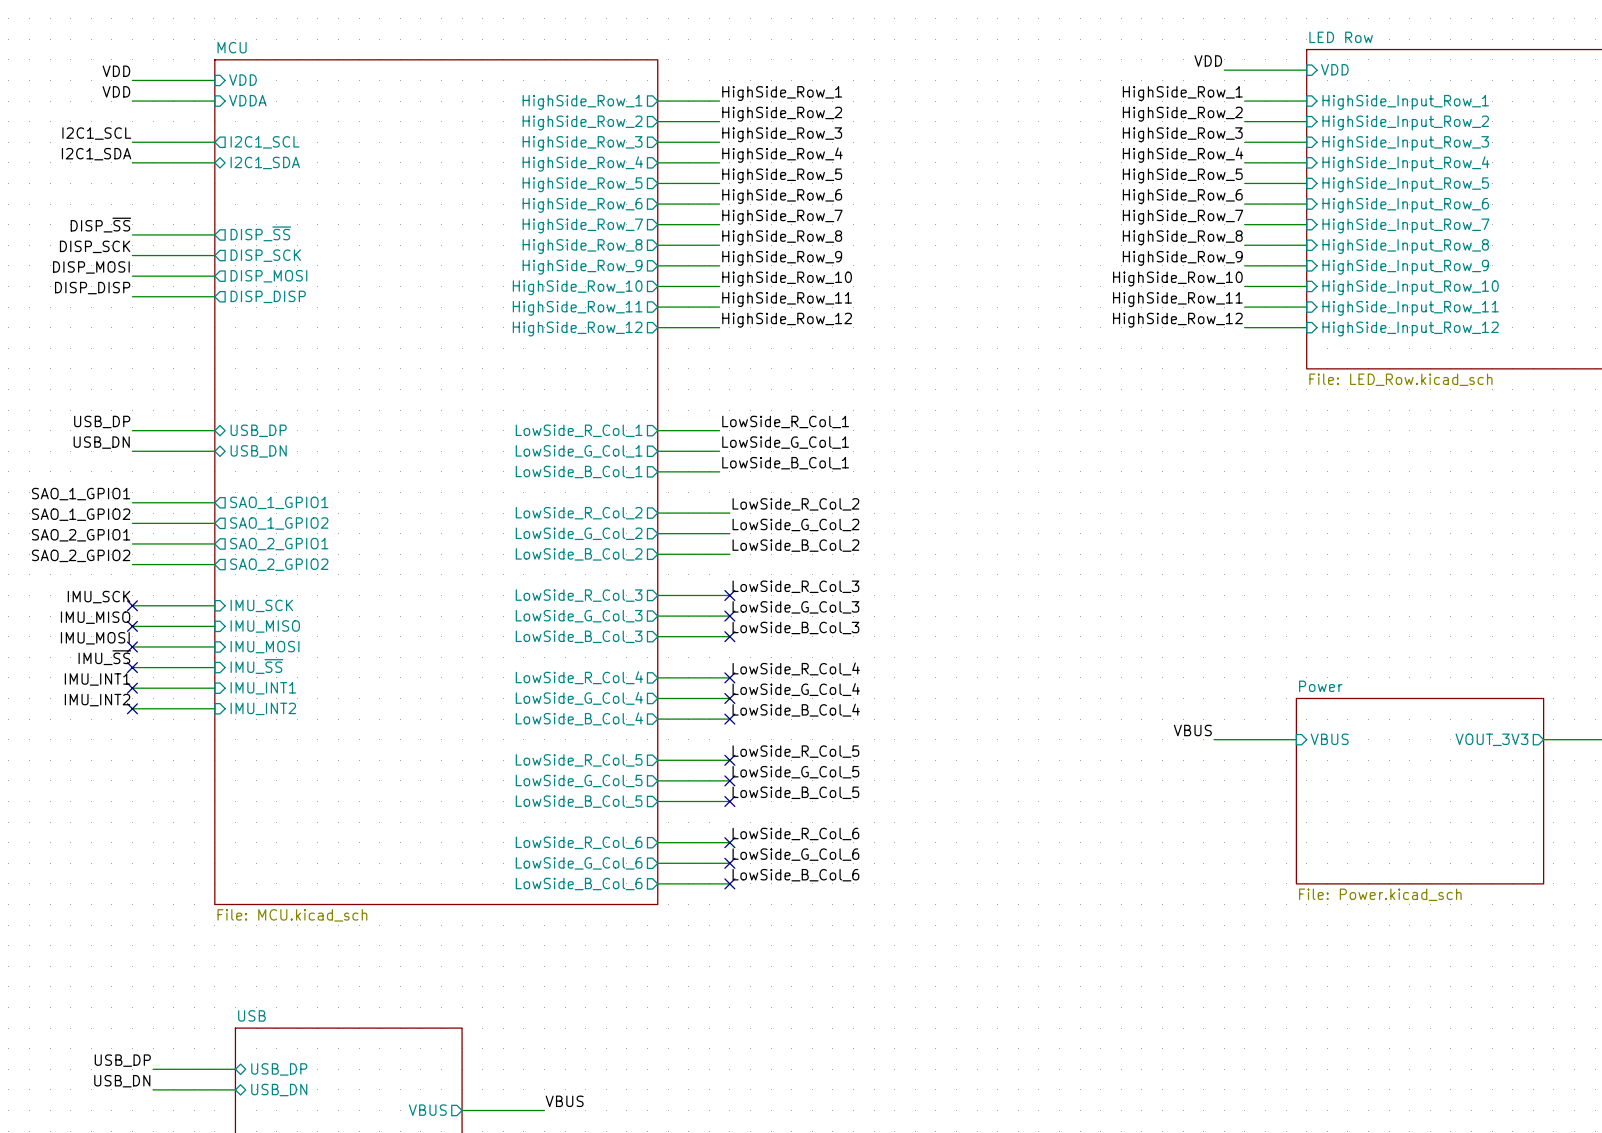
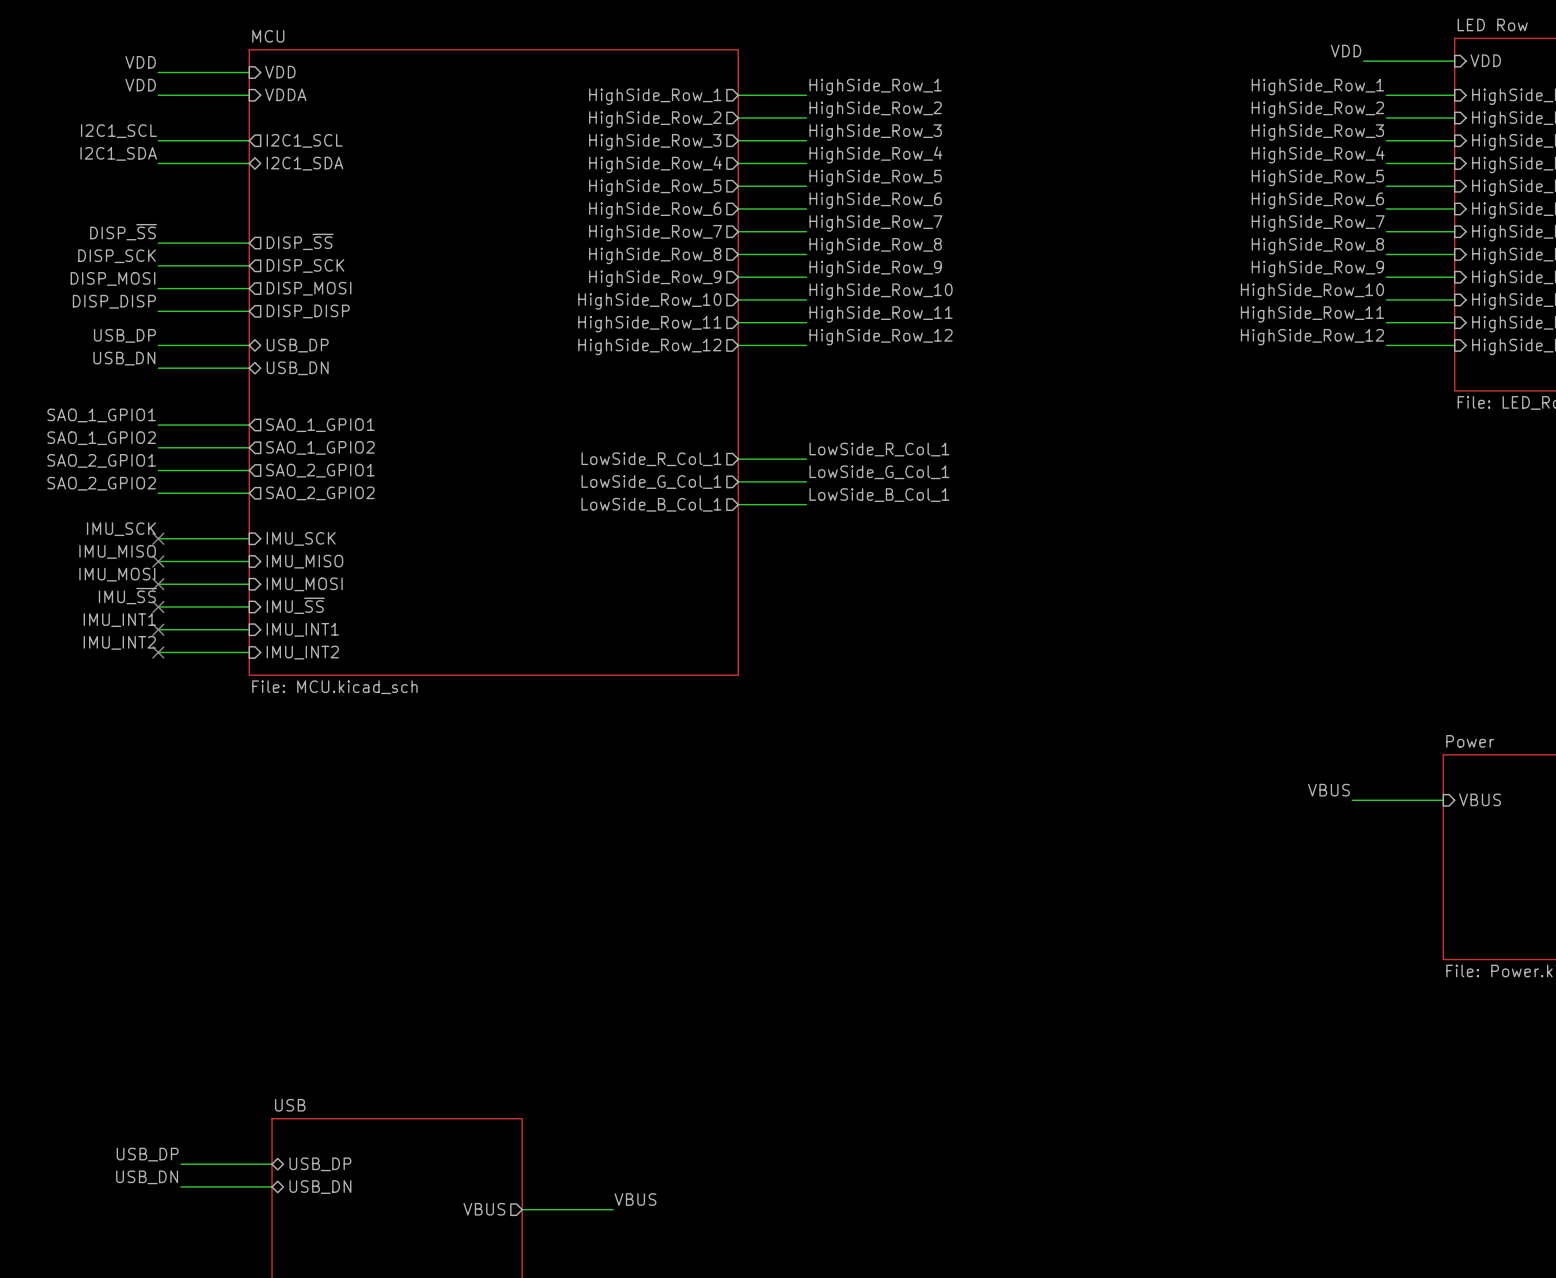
sheet MCU: none -> File: MCU.kicad_sch (493, 362)
label: none -> SAO_1_GPIO1 (101, 415)
wire: none -> (158, 425) (249, 425)
sheet pin: none -> SAO_1_GPIO1 (320, 425)
label: none -> SAO_1_GPIO2 (101, 438)
wire: none -> (158, 447) (249, 447)
sheet pin: none -> SAO_1_GPIO2 (320, 447)
label position: USB_DP (102, 421) -> USB_DP (124, 335)
wire: (132, 430) (214, 430) -> (158, 345) (249, 345)
sheet pin position: USB_DP (258, 430) -> USB_DP (297, 345)
label: none -> SAO_2_GPIO1 (101, 460)
sheet pin: none -> SAO_2_GPIO1 (320, 470)
label position: USB_DN (101, 442) -> USB_DN (124, 358)
wire: (132, 451) (214, 451) -> (158, 368) (249, 368)
sheet pin position: USB_DN (258, 451) -> USB_DN (297, 368)
label: none -> SAO_2_GPIO2 (101, 483)
sheet pin: none -> SAO_2_GPIO2 (320, 493)
sheet MCU: File: MCU.kicad_sch (436, 482) -> none
label: SAO_1_GPIO1 (81, 494) -> IMU_SCK (121, 529)
no-connect mark: none -> (158, 538)
sheet pin shape: output (279, 502) -> input (301, 538)
sheet pin: SAO_1_GPIO1 (279, 502) -> IMU_SCK (301, 538)
label: LowSide_R_Col_2 (795, 504) -> none
sheet pin: LowSide_R_Col_2 (579, 513) -> none
wire: (657, 513) (729, 513) -> none
label: SAO_1_GPIO2 (81, 514) -> IMU_MISO (117, 551)
no-connect mark: none -> (158, 561)
sheet pin shape: output (279, 523) -> input (304, 561)
sheet pin: SAO_1_GPIO2 (279, 523) -> IMU_MISO (304, 561)
label: LowSide_G_Col_2 (795, 524) -> none
sheet pin: LowSide_G_Col_2 (579, 533) -> none
wire: (657, 533) (729, 533) -> none
label: SAO_2_GPIO1 (81, 535) -> IMU_MOSI (117, 574)
no-connect mark: none -> (158, 584)
sheet pin shape: output (279, 544) -> input (304, 584)
sheet pin: SAO_2_GPIO1 (279, 544) -> IMU_MOSI (304, 584)
label: LowSide_B_Col_2 (795, 545) -> none
sheet pin: LowSide_B_Col_2 (579, 554) -> none
wire: (657, 554) (729, 554) -> none
label: SAO_2_GPIO2 (81, 555) -> IMU_~{SS} (127, 596)
no-connect mark: none -> (158, 606)
sheet pin shape: output (279, 564) -> input (295, 605)
sheet pin: SAO_2_GPIO2 (279, 564) -> IMU_~{SS} (295, 605)
no-connect mark: none -> (158, 629)
label: LowSide_R_Col_3 (795, 586) -> none
sheet pin: LowSide_R_Col_3 (579, 595) -> none
wire: (657, 595) (729, 595) -> none
no-connect mark: (729, 595) -> none
label: IMU_SCK (98, 597) -> IMU_INT2 (119, 642)
sheet pin: IMU_SCK (261, 605) -> IMU_INT2 (302, 652)
label: LowSide_G_Col_3 (795, 607) -> none
sheet pin: LowSide_G_Col_3 (579, 616) -> none
wire: (657, 616) (729, 616) -> none
no-connect mark: (729, 616) -> none
label: IMU_MISO (95, 617) -> none
wire: (132, 626) (214, 626) -> (158, 470) (249, 470)
no-connect mark: (132, 626) -> none
sheet pin: IMU_MISO (265, 626) -> none
label: LowSide_B_Col_3 (795, 627) -> none
sheet pin: LowSide_B_Col_3 (579, 636) -> none
wire: (657, 636) (729, 636) -> none
no-connect mark: (729, 636) -> none
label: IMU_MOSI (95, 638) -> none
wire: (132, 646) (214, 646) -> (158, 493) (249, 493)
no-connect mark: (132, 646) -> none
sheet pin: IMU_MOSI (265, 647) -> none
label: IMU_~{SS} (104, 657) -> none
sheet pin: IMU_~{SS} (256, 666) -> none
wire: (132, 667) (214, 667) -> none
no-connect mark: (132, 667) -> none
label: LowSide_R_Col_4 (796, 668) -> none
sheet pin: LowSide_R_Col_4 (579, 677) -> none
wire: (657, 677) (729, 677) -> none
no-connect mark: (729, 677) -> none
label position: IMU_INT1 (97, 679) -> IMU_INT1 (119, 620)
wire: (132, 688) (214, 688) -> (158, 629) (249, 629)
no-connect mark: (132, 688) -> none
sheet pin position: IMU_INT1 (263, 688) -> IMU_INT1 (302, 629)
label: LowSide_G_Col_4 (796, 689) -> none
sheet pin: LowSide_G_Col_4 (579, 698) -> none
wire: (657, 698) (729, 698) -> none
no-connect mark: (729, 698) -> none
label: IMU_INT2 (97, 700) -> none
wire: (132, 708) (214, 708) -> none
no-connect mark: (132, 708) -> none
sheet pin: IMU_INT2 (263, 708) -> none
label: LowSide_B_Col_4 (796, 710) -> none
sheet pin: LowSide_B_Col_4 (579, 718) -> none
wire: (657, 719) (729, 719) -> none
no-connect mark: (729, 719) -> none
label: LowSide_R_Col_5 (795, 751) -> none
sheet pin: LowSide_R_Col_5 (579, 760) -> none
wire: (657, 760) (729, 760) -> none
no-connect mark: (729, 760) -> none
label: LowSide_G_Col_5 (795, 772) -> none
sheet pin: LowSide_G_Col_5 (579, 780) -> none
wire: (657, 780) (729, 780) -> none
no-connect mark: (729, 780) -> none
label: LowSide_B_Col_5 (795, 792) -> none
sheet pin: LowSide_B_Col_5 (579, 801) -> none
wire: (657, 801) (729, 801) -> none
no-connect mark: (729, 801) -> none
label: LowSide_R_Col_6 (795, 833) -> none
sheet pin: LowSide_R_Col_6 (579, 842) -> none
wire: (657, 842) (729, 842) -> none
no-connect mark: (729, 842) -> none
label: LowSide_G_Col_6 (795, 854) -> none
sheet pin: LowSide_G_Col_6 (579, 863) -> none
wire: (657, 863) (729, 863) -> none
no-connect mark: (729, 863) -> none
label: LowSide_B_Col_6 (795, 875) -> none
wire: (657, 883) (729, 883) -> none
no-connect mark: (729, 883) -> none
sheet pin: LowSide_B_Col_6 (579, 884) -> none

